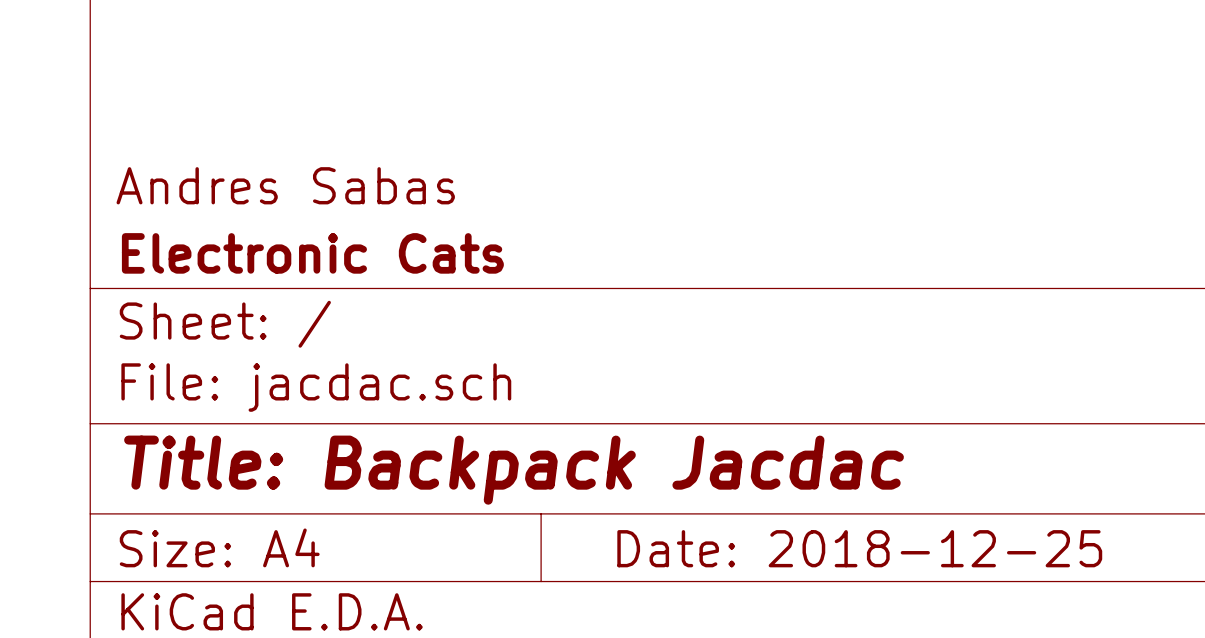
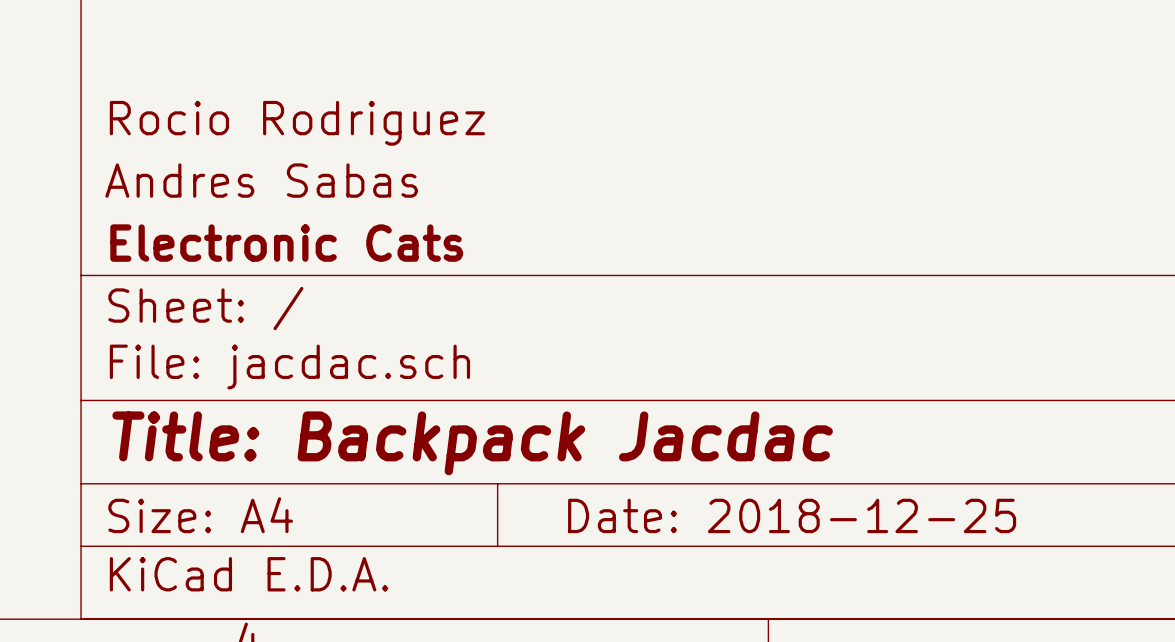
title block: none -> Rocio Rodriguez (297, 123)

